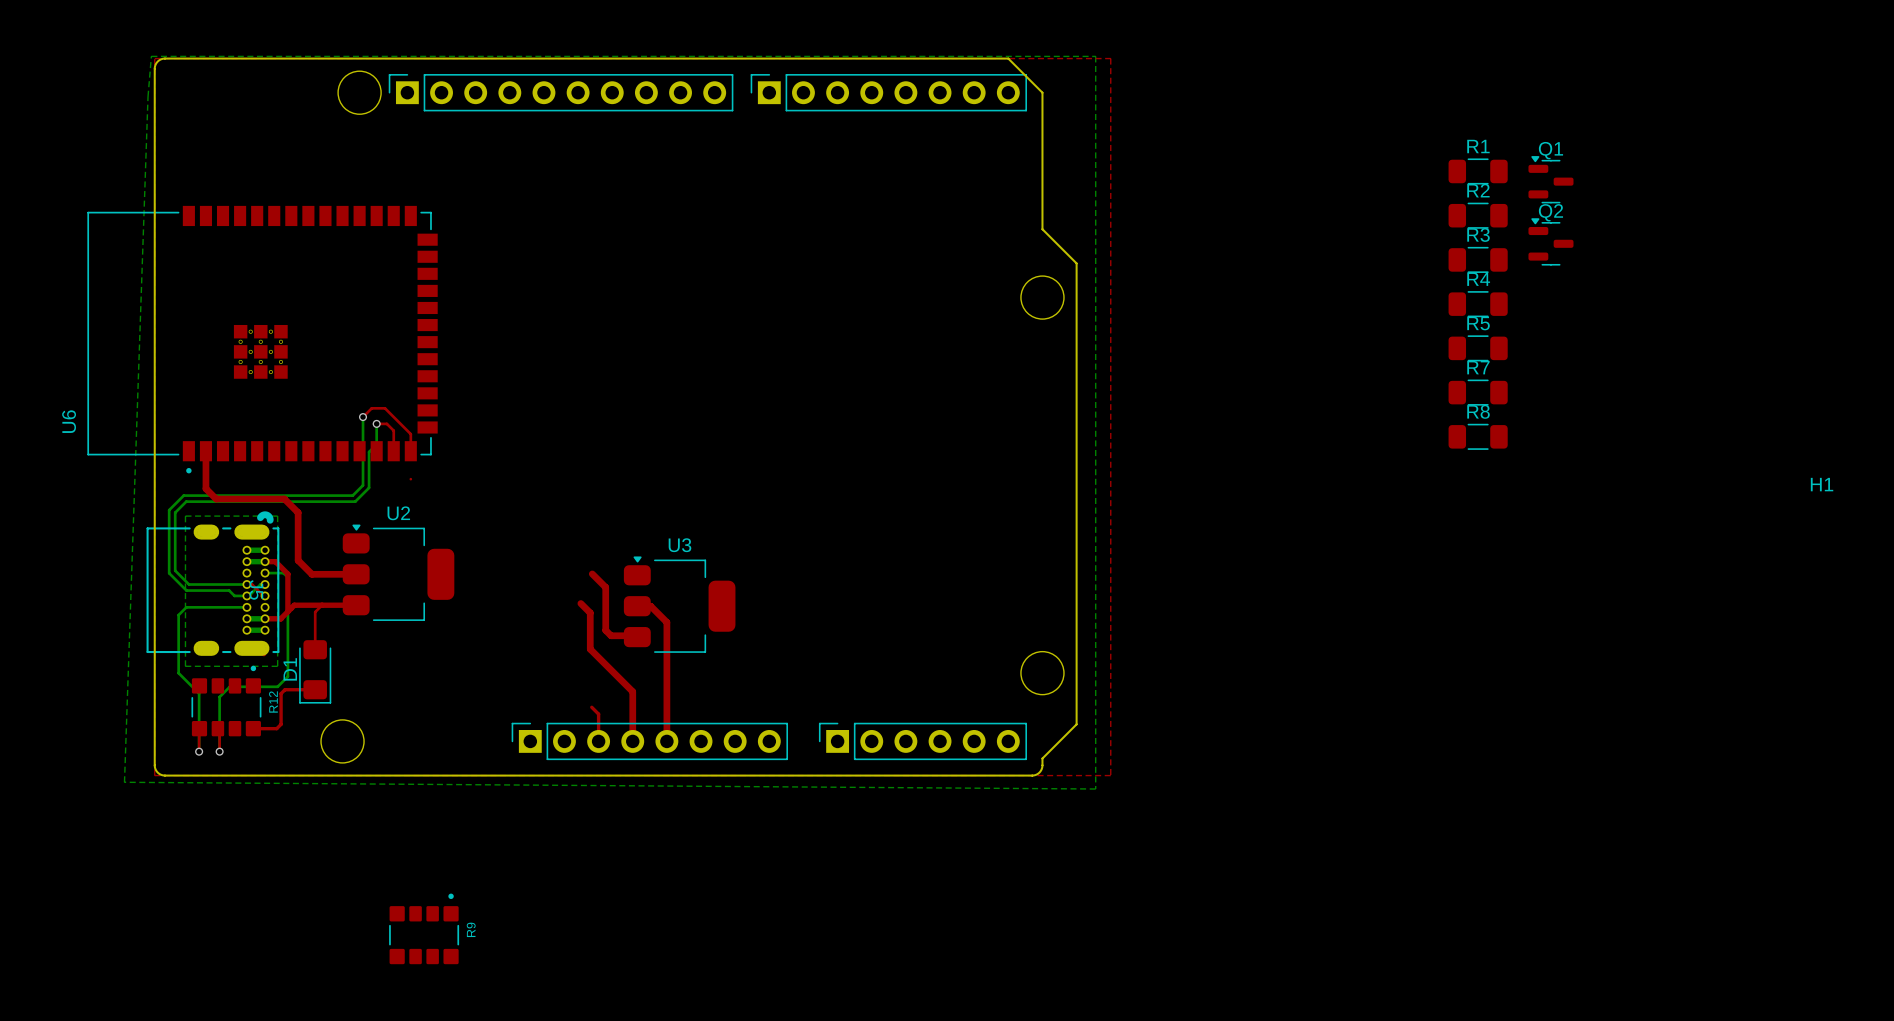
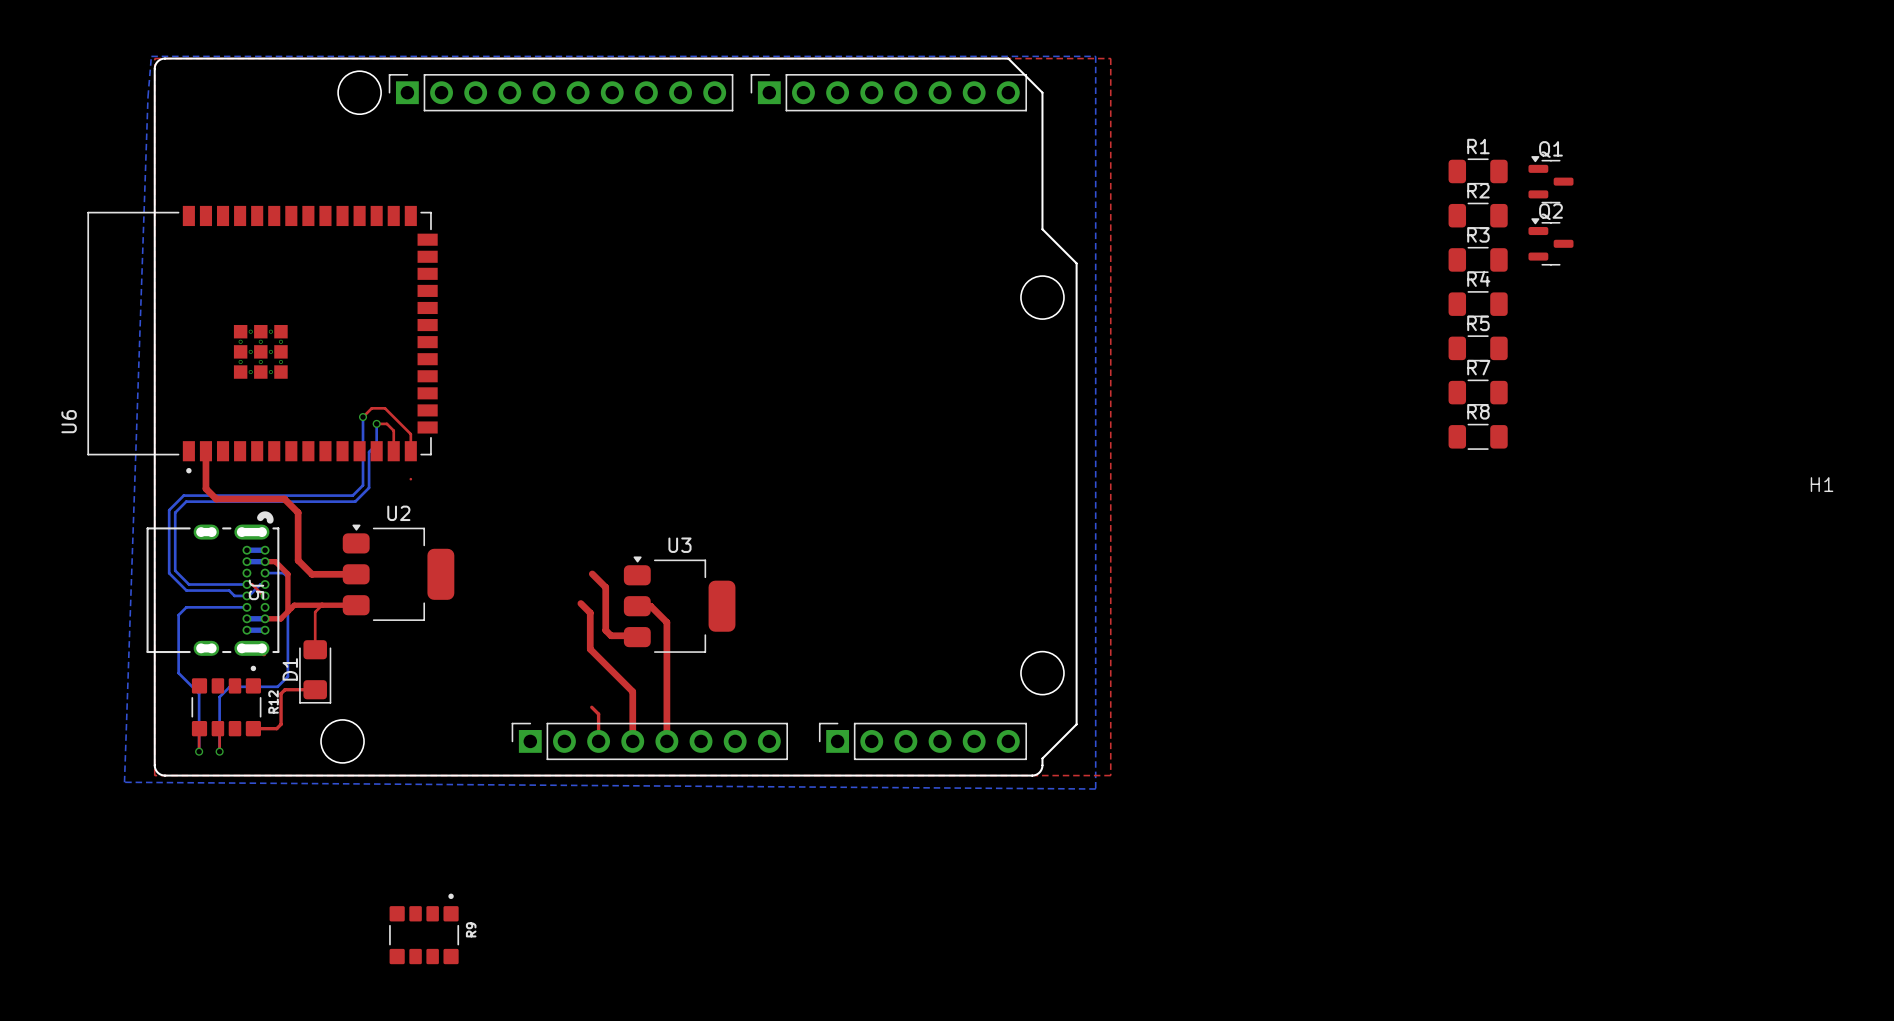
bottom zone outline: (185, 516) (277, 516) (277, 666) (185, 666) (185, 516) -> none

